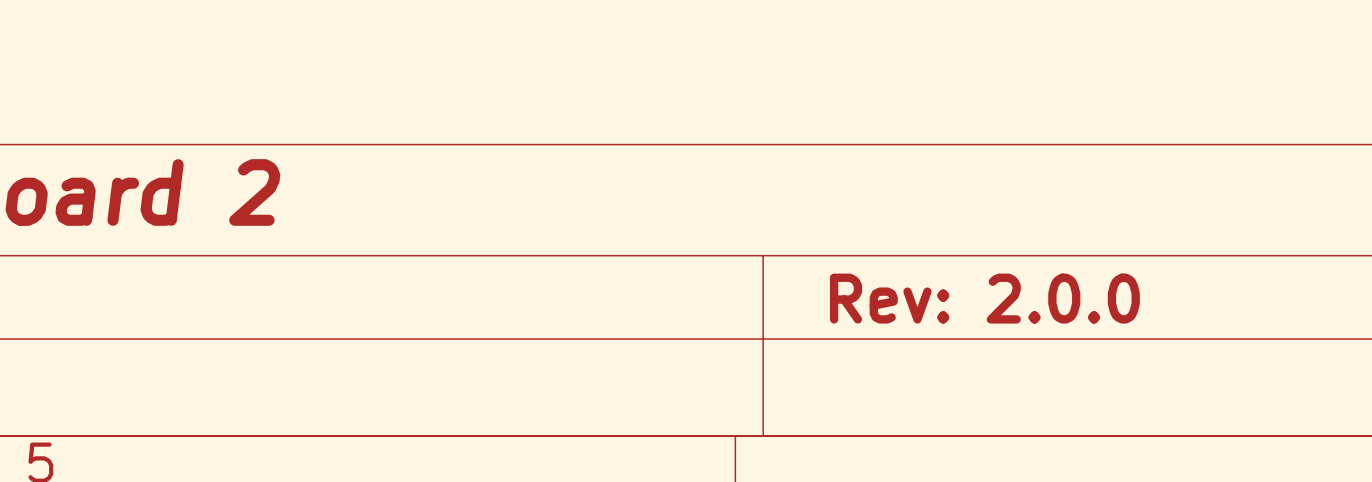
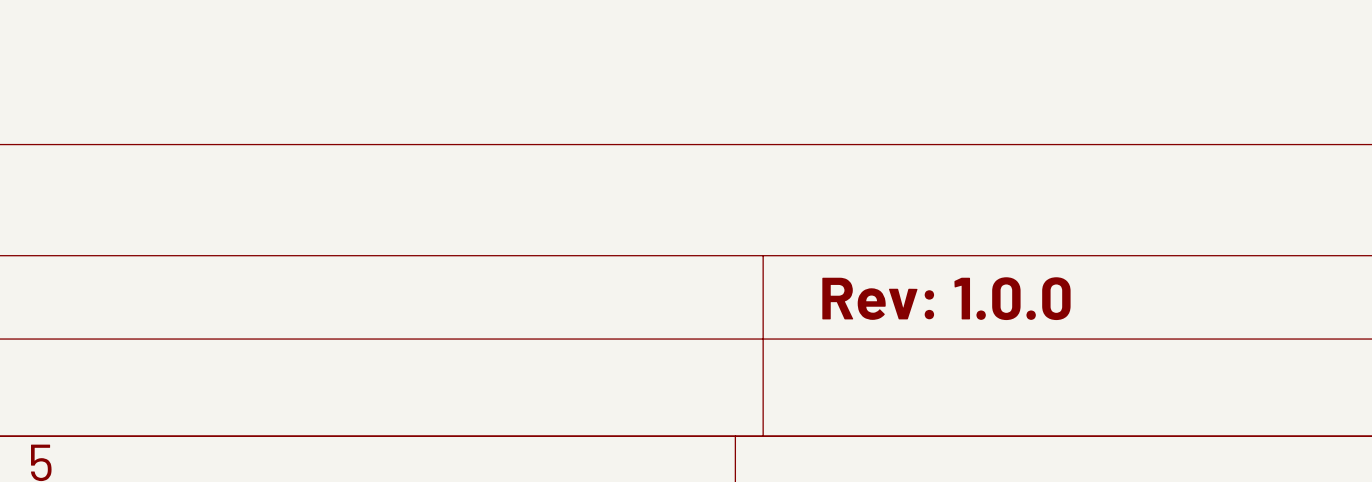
title block: Rev: 2.0.0 (984, 298) -> Rev: 1.0.0 (946, 298)

